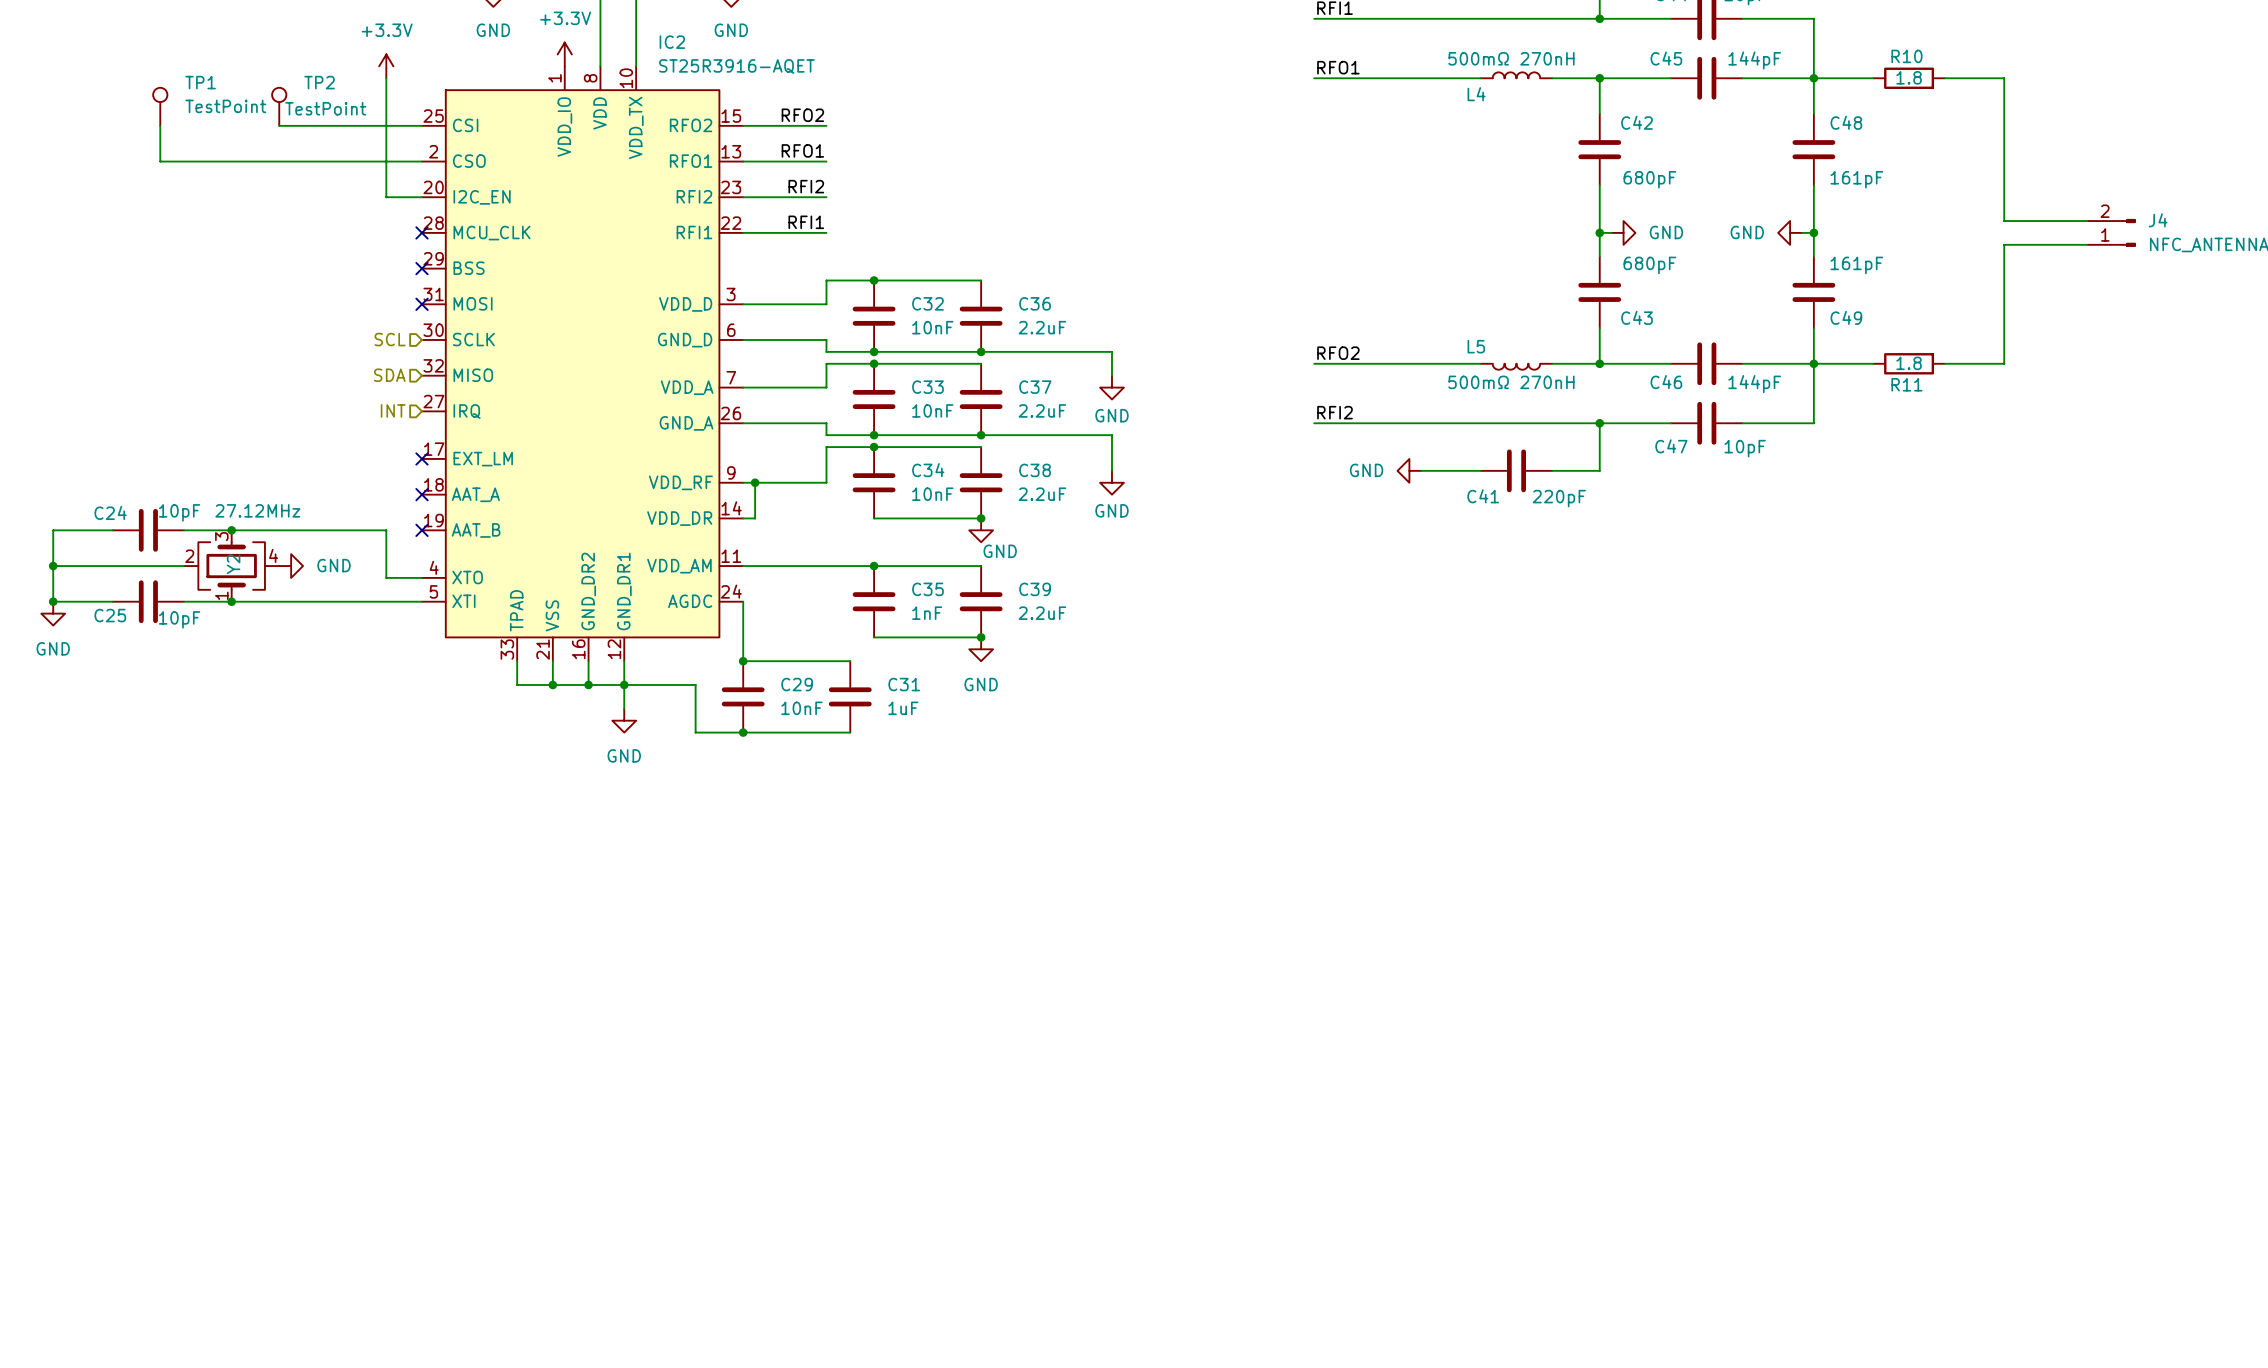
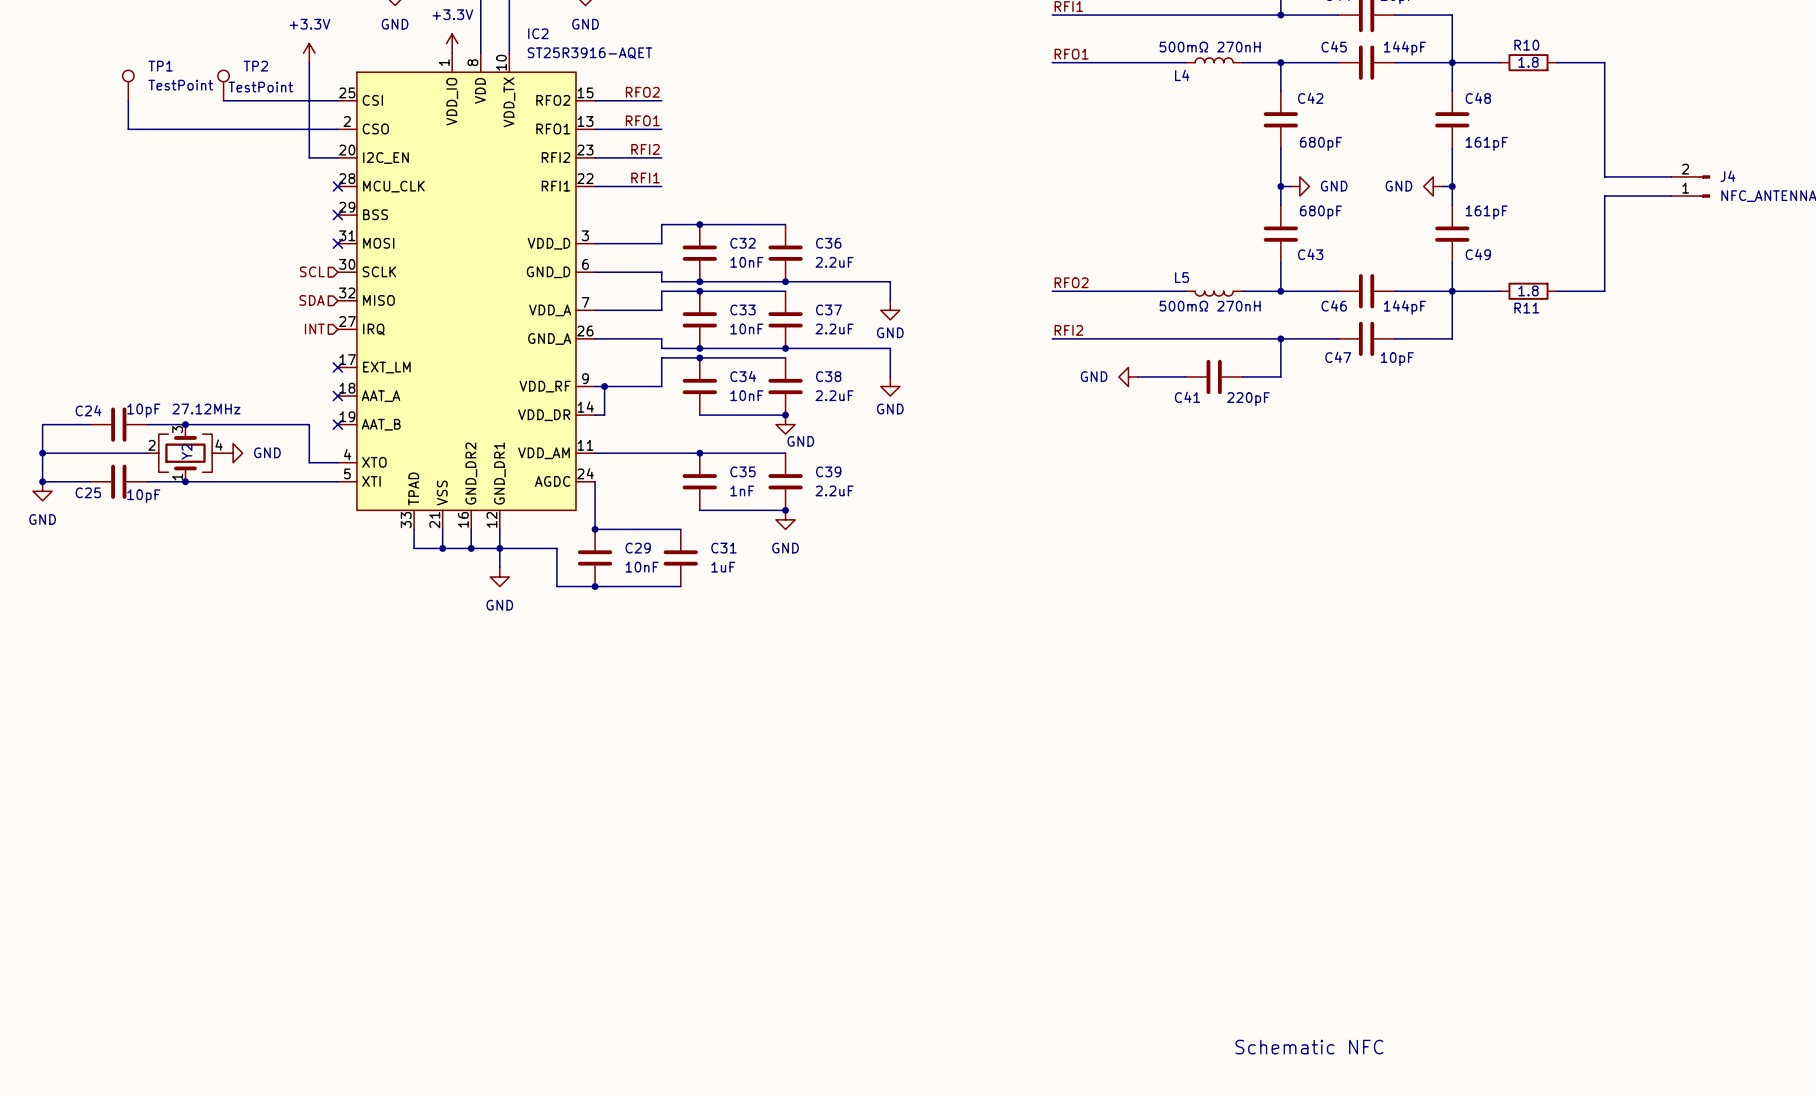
text: none -> Schematic NFC (1309, 1047)

